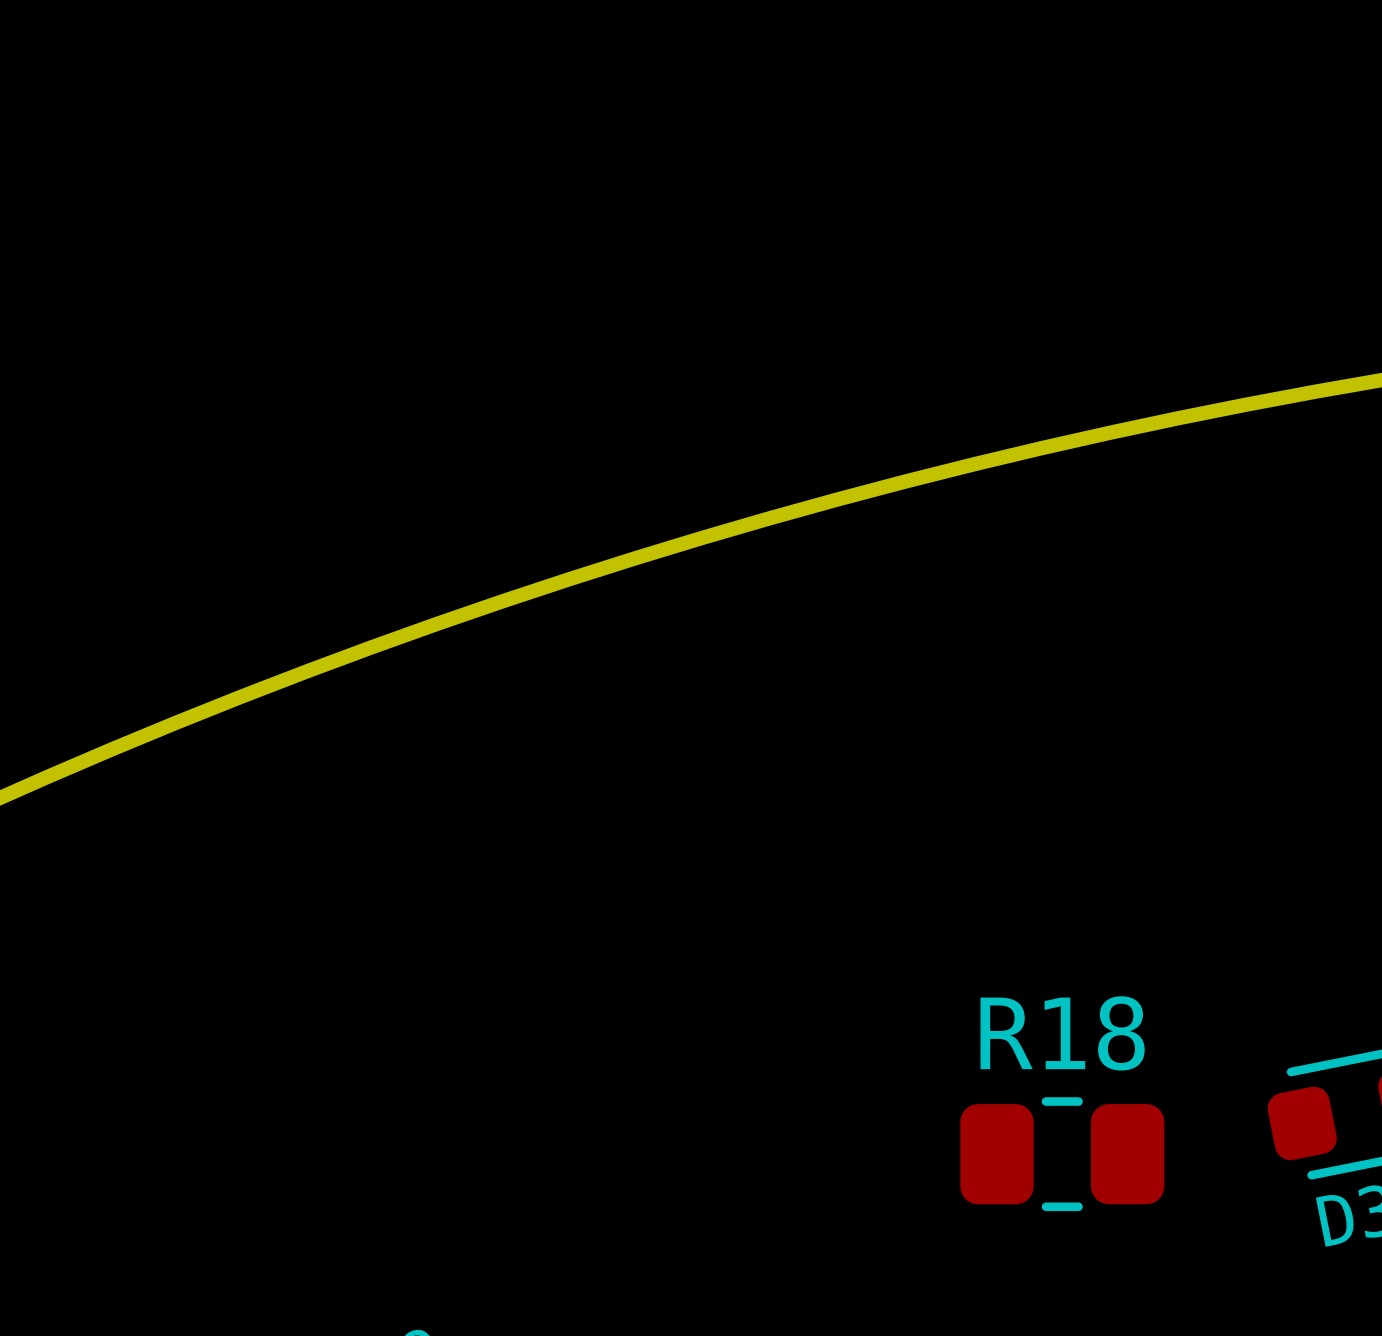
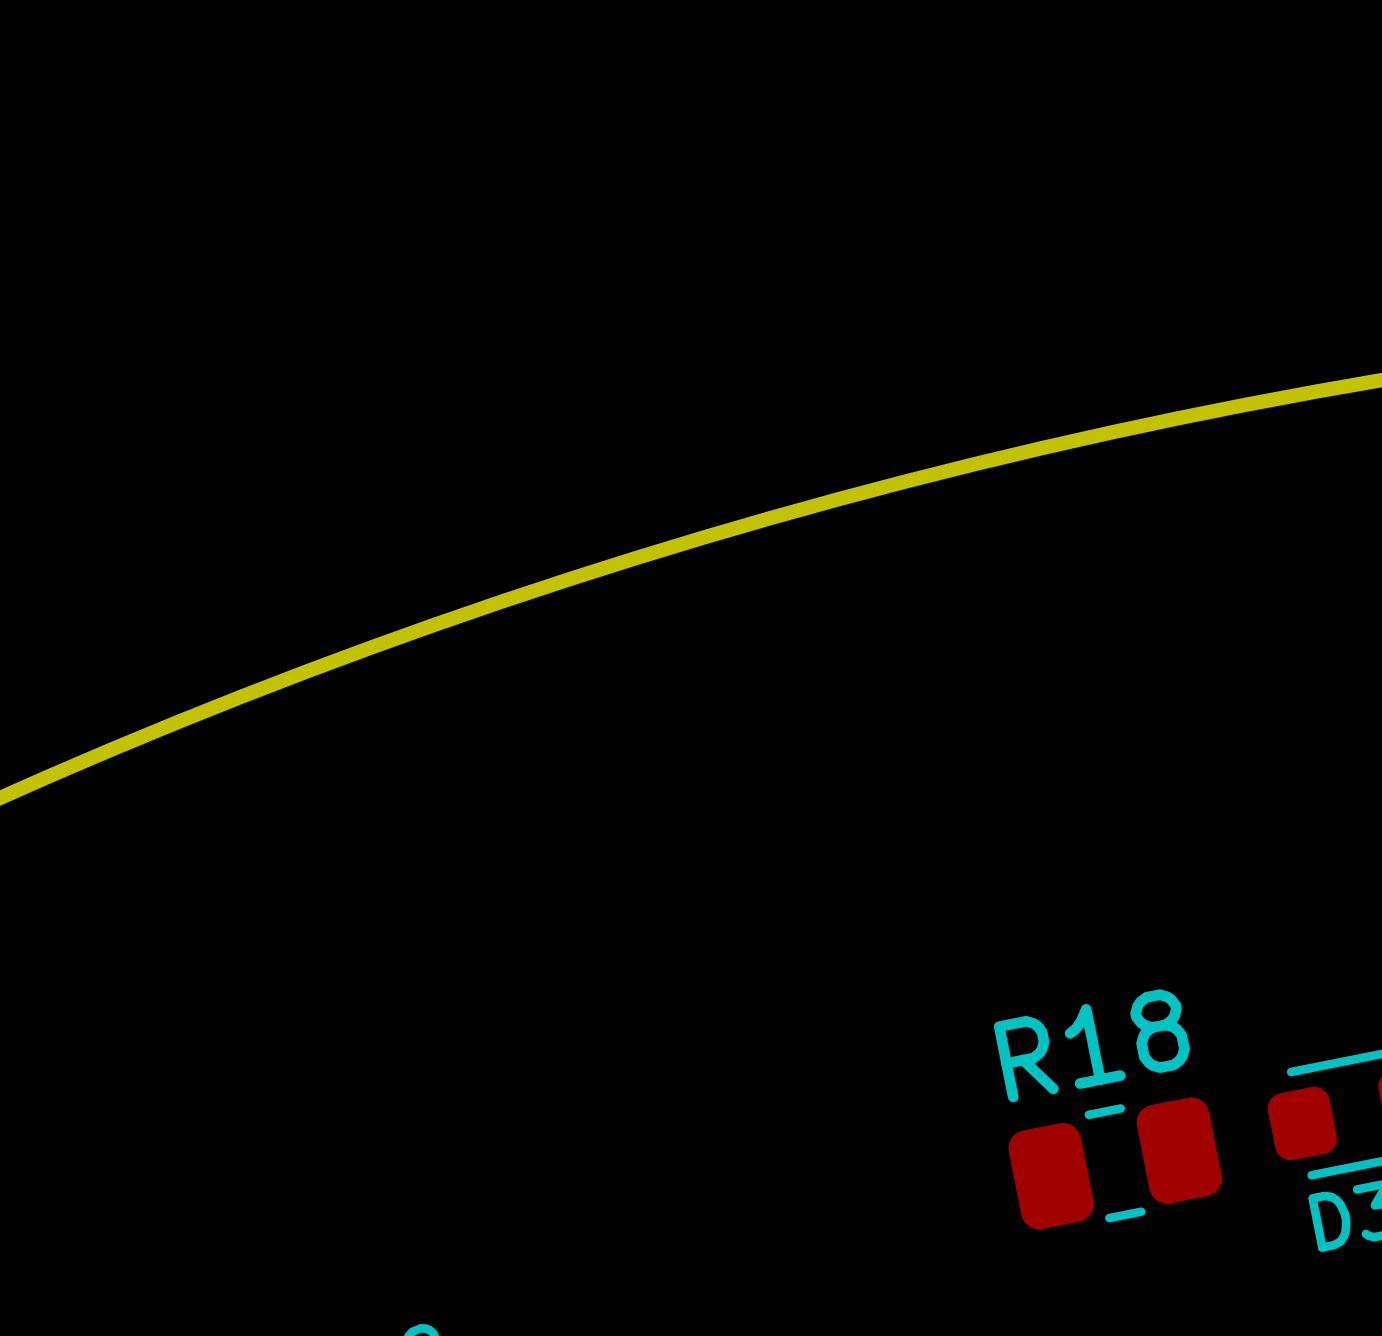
R18 rotation: 0° (1062, 1154) -> 11.2° counterclockwise (1115, 1163)

